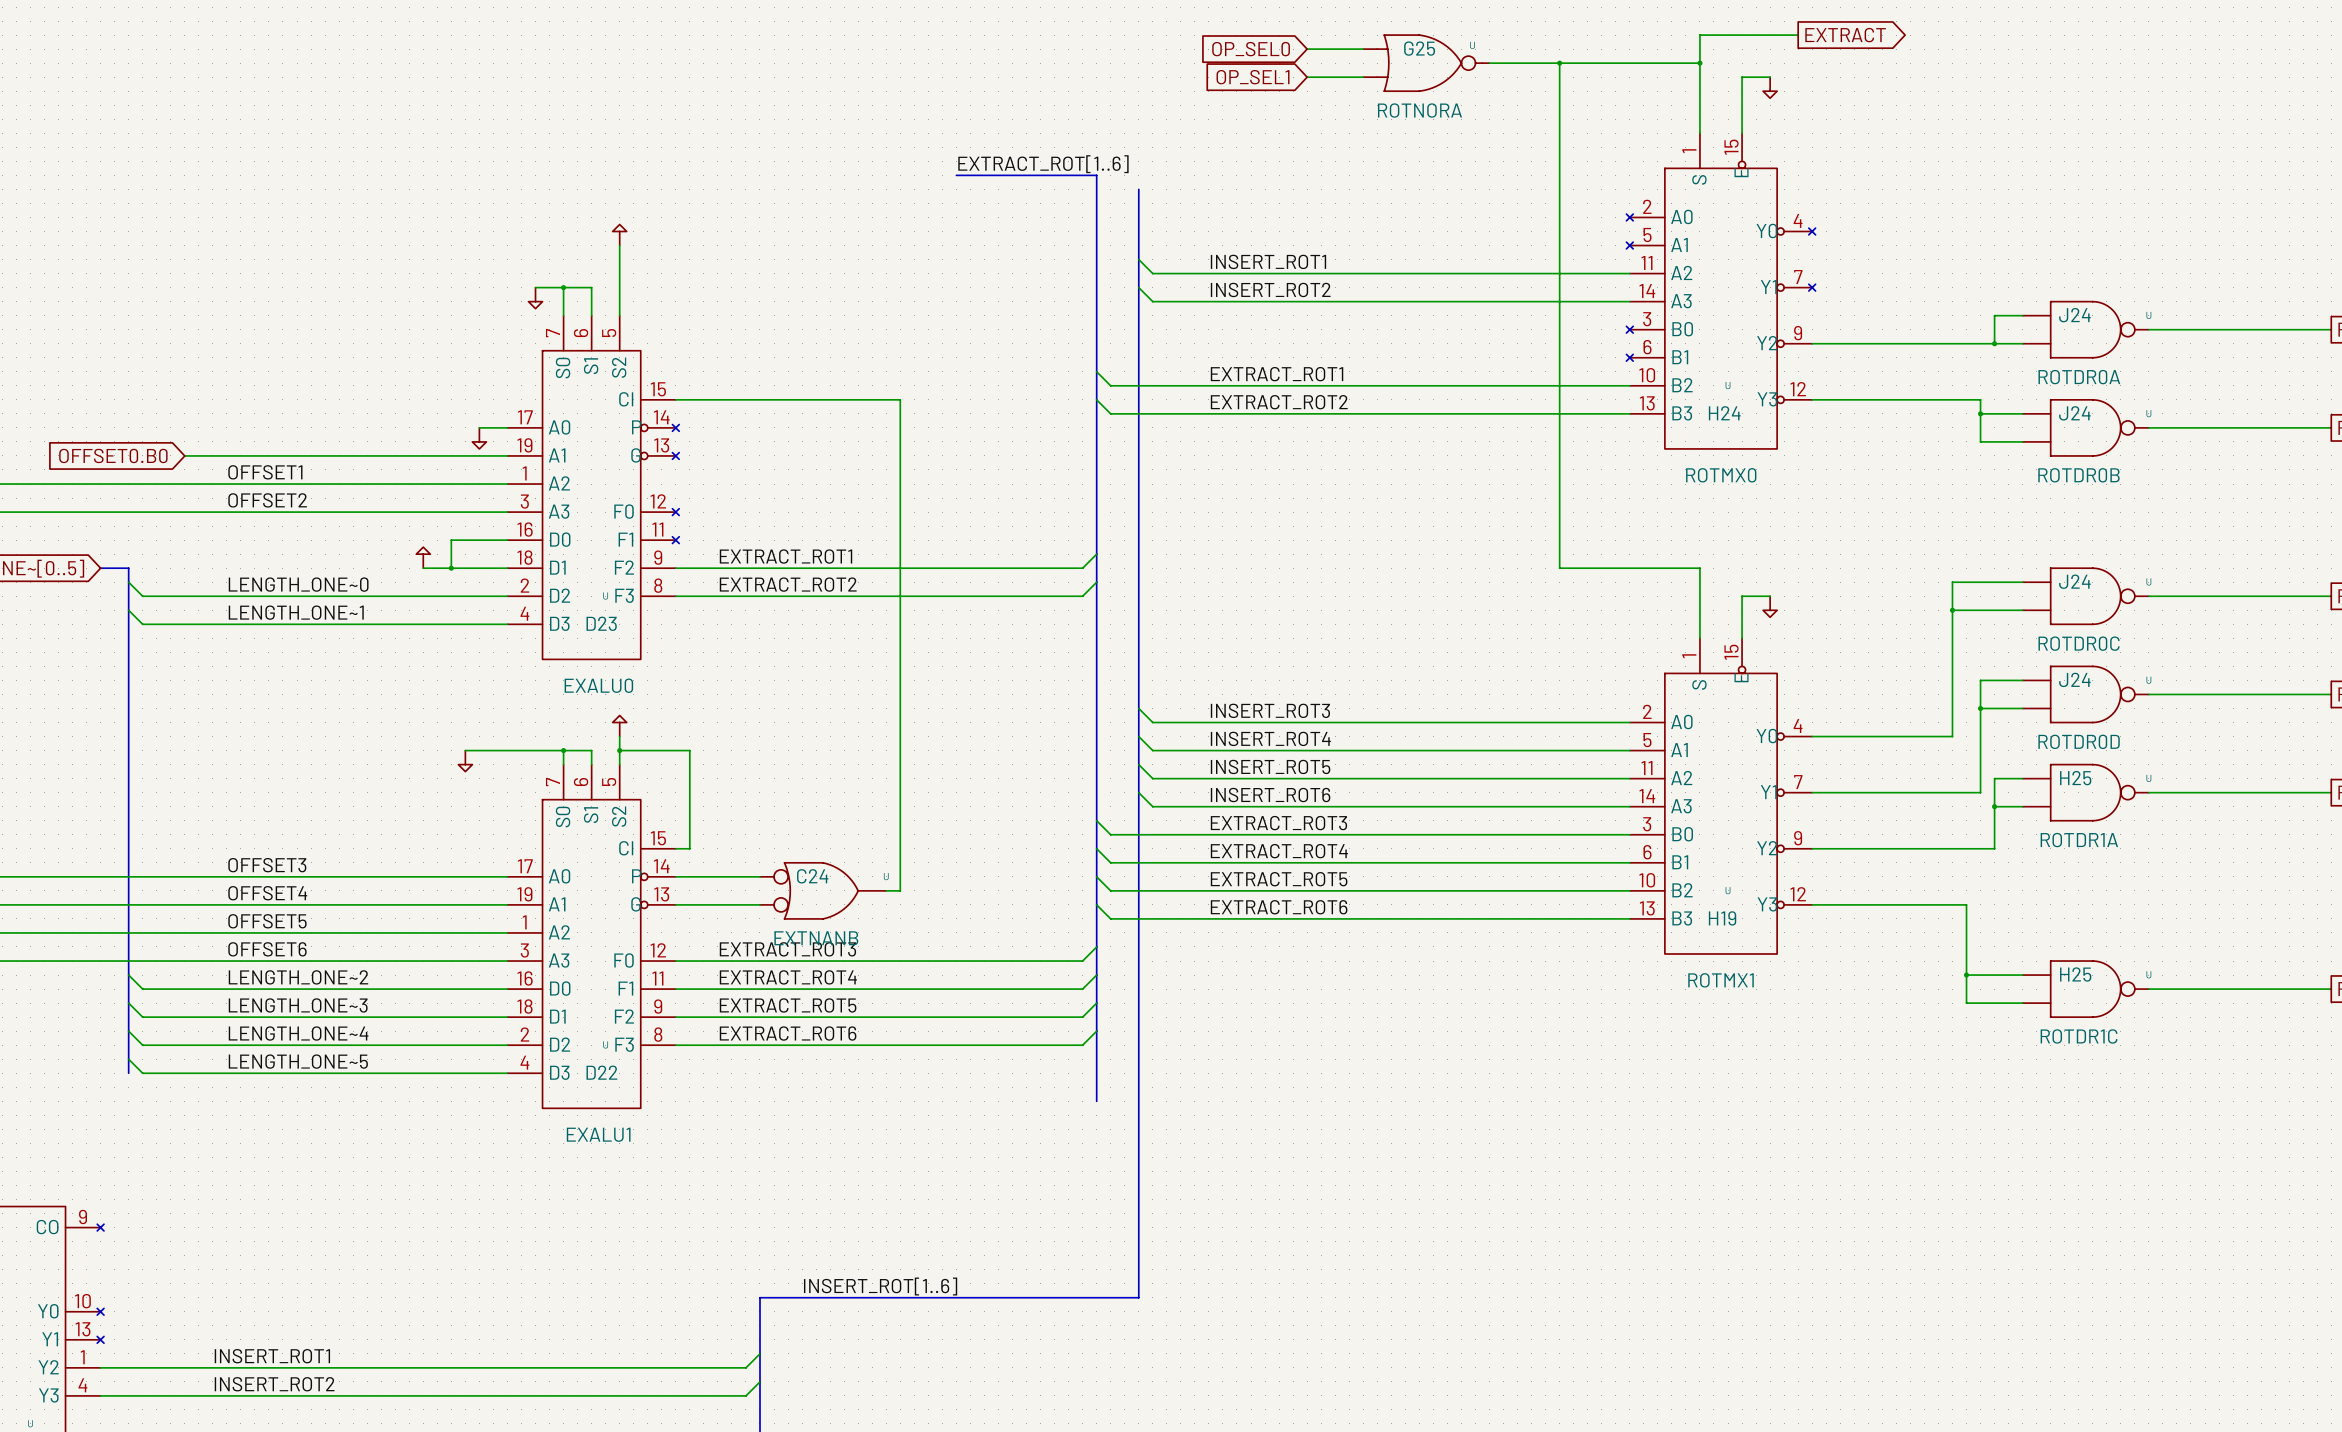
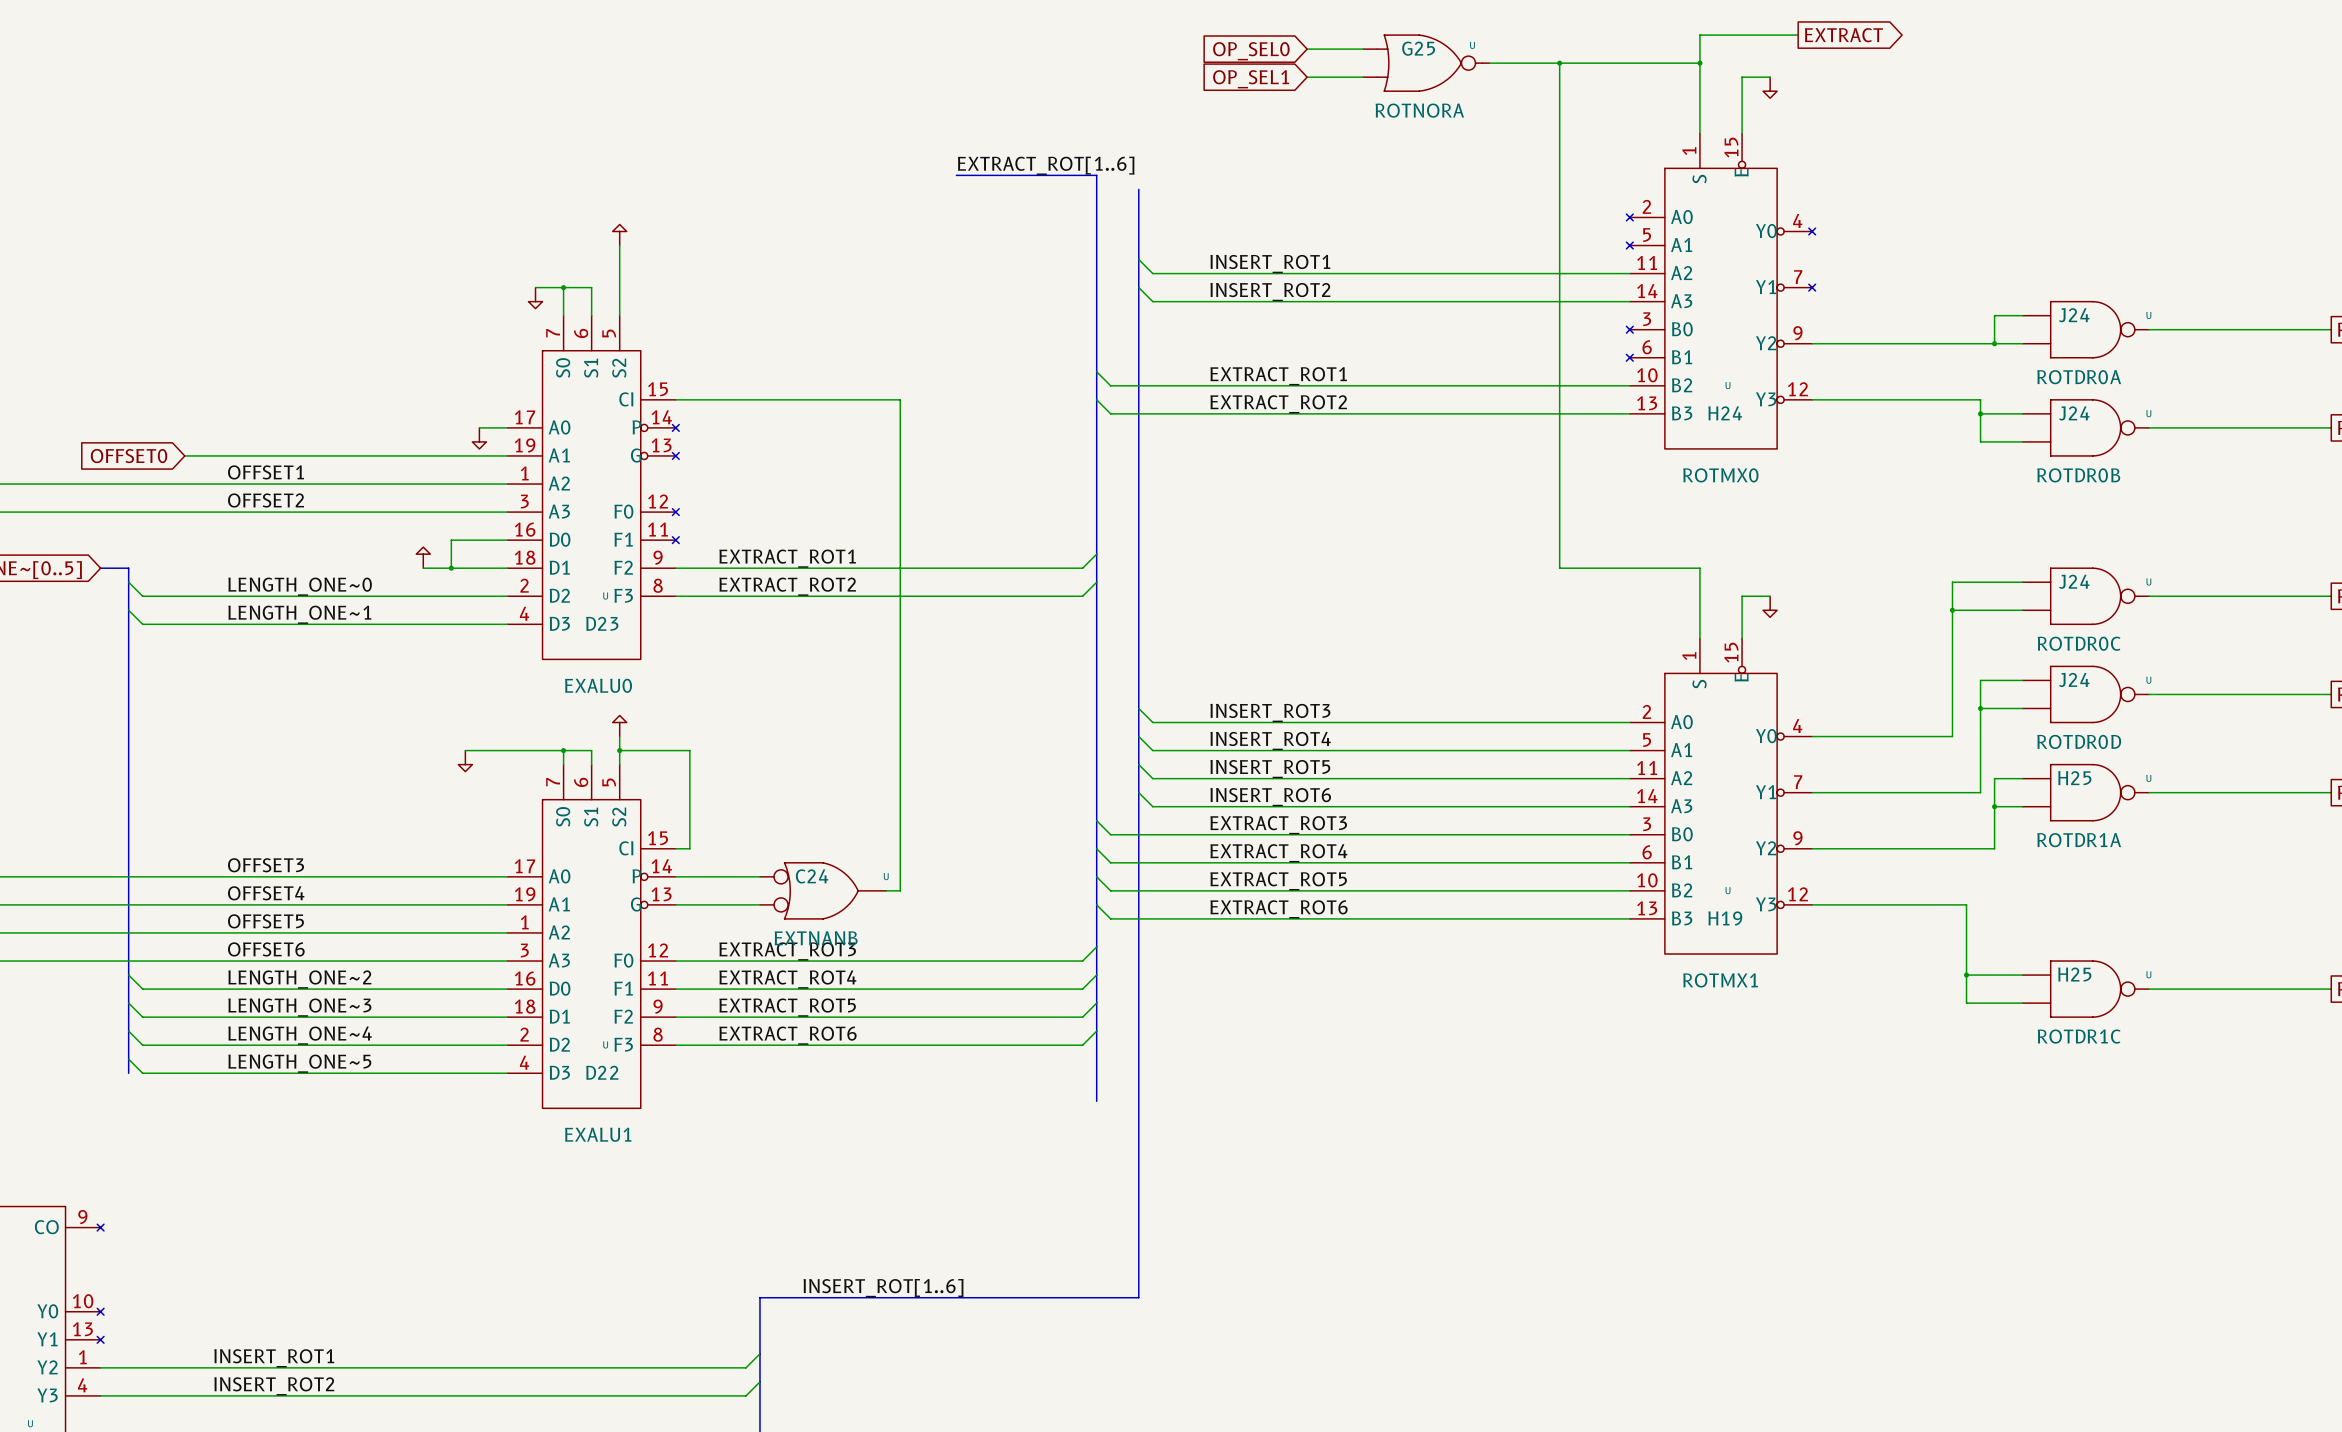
global label: OFFSET0.B0 (113, 455) -> OFFSET0 (129, 456)

